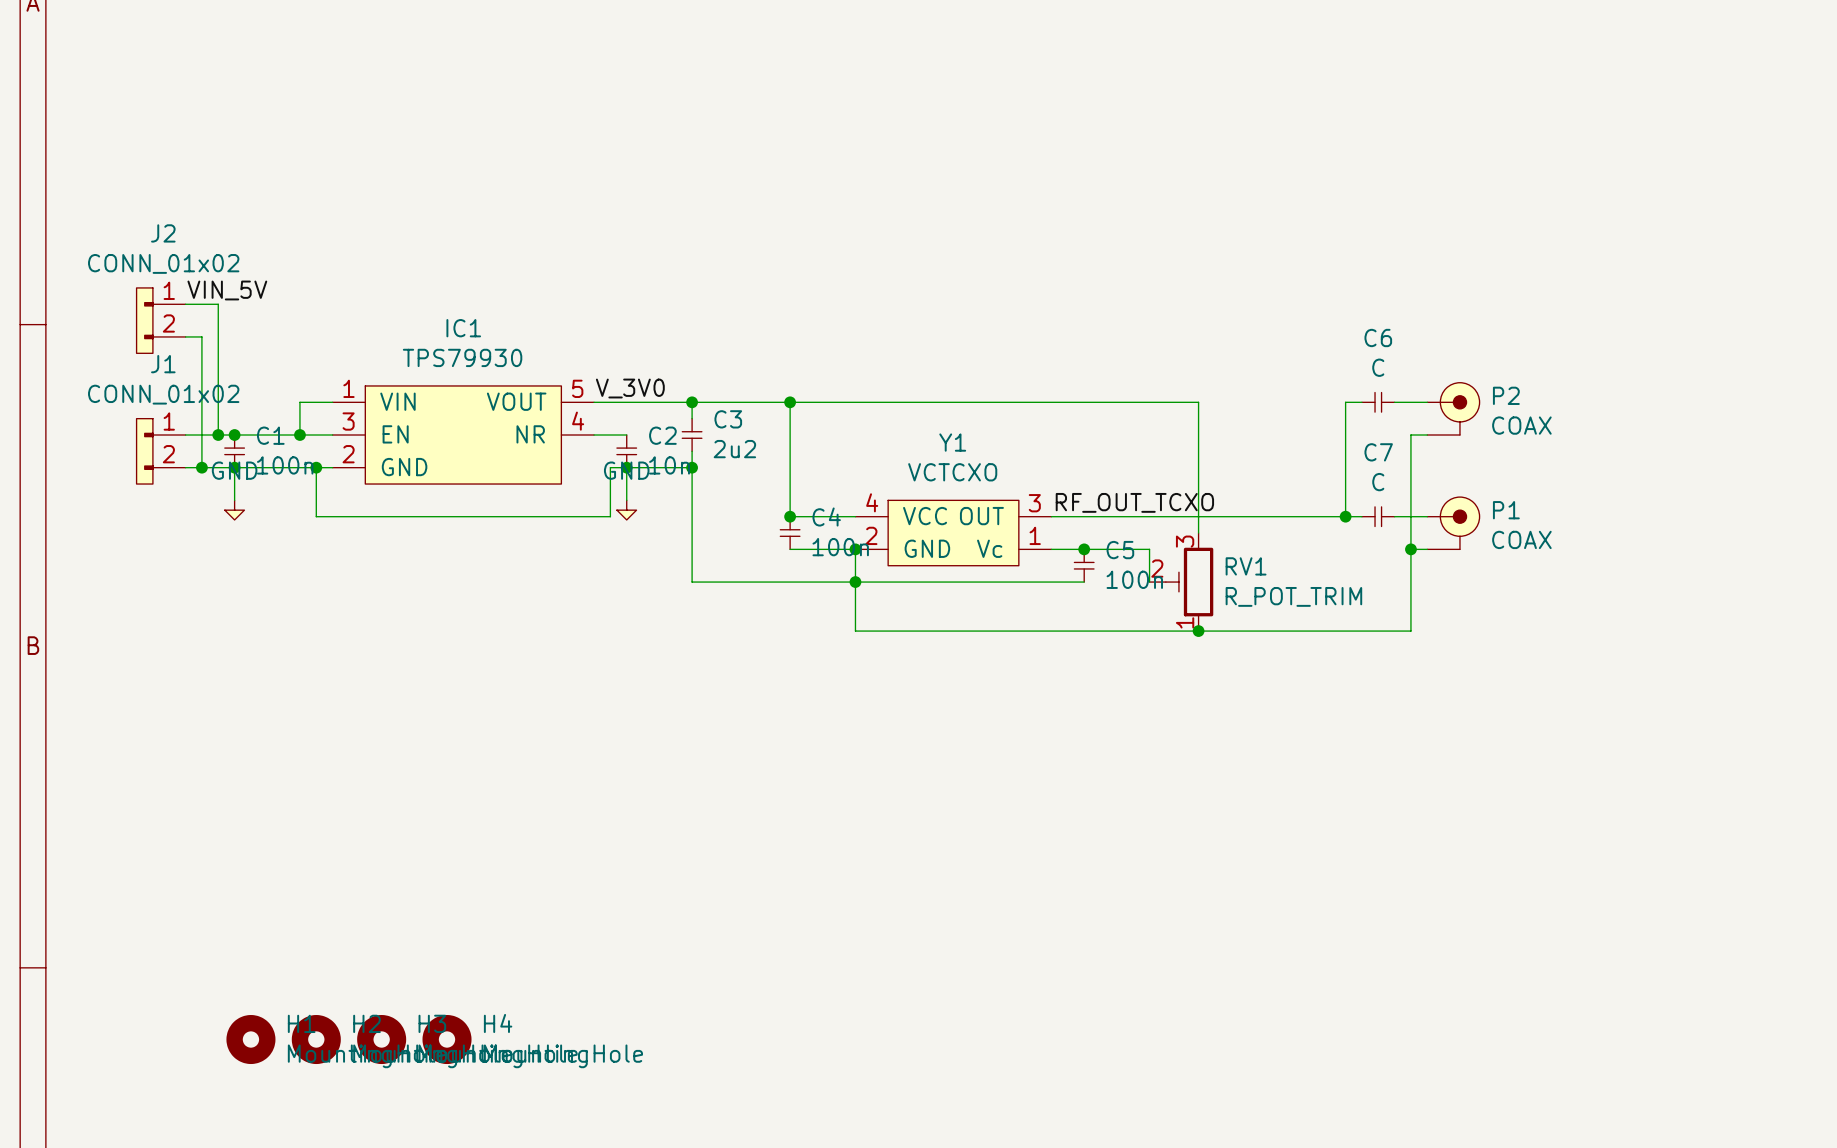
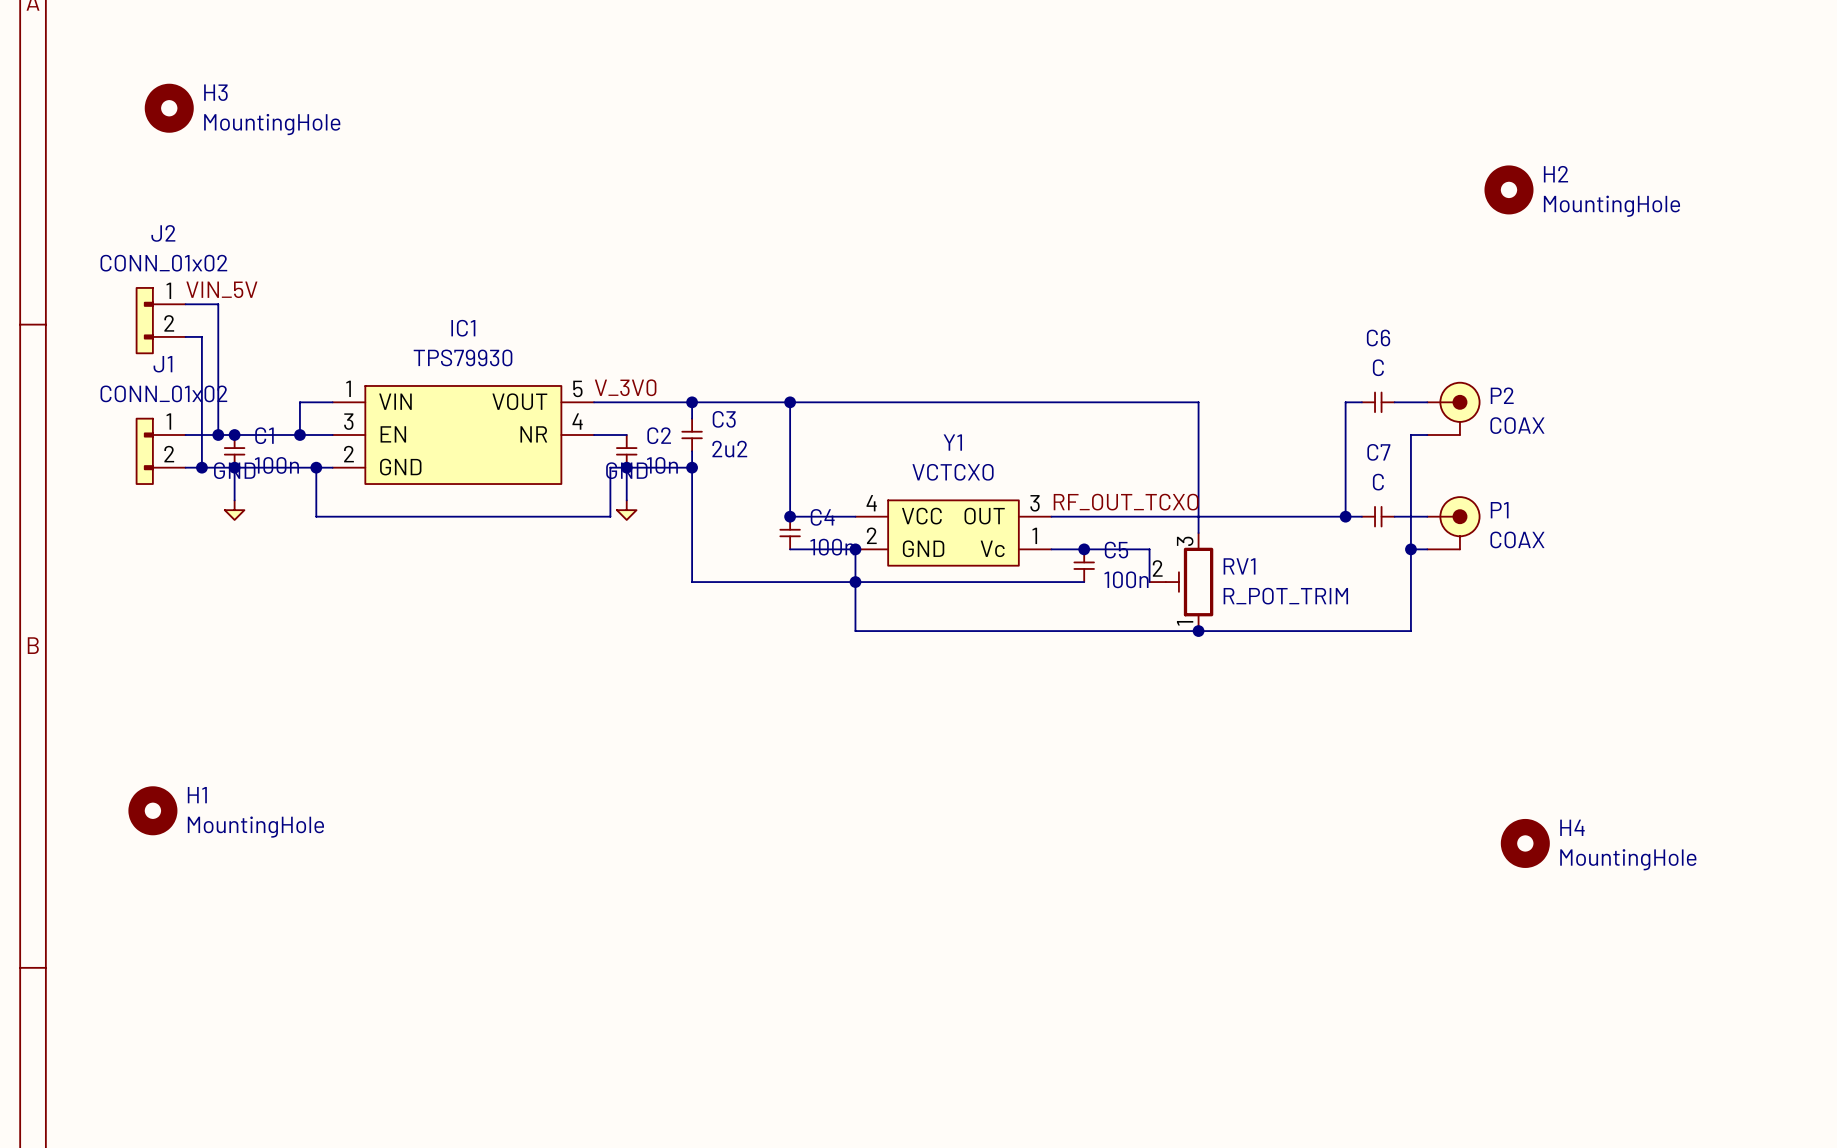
H1 position: (250, 1039) -> (152, 810)
H2 position: (316, 1039) -> (1508, 189)
H3 position: (381, 1039) -> (169, 108)
H4 position: (447, 1039) -> (1525, 843)

